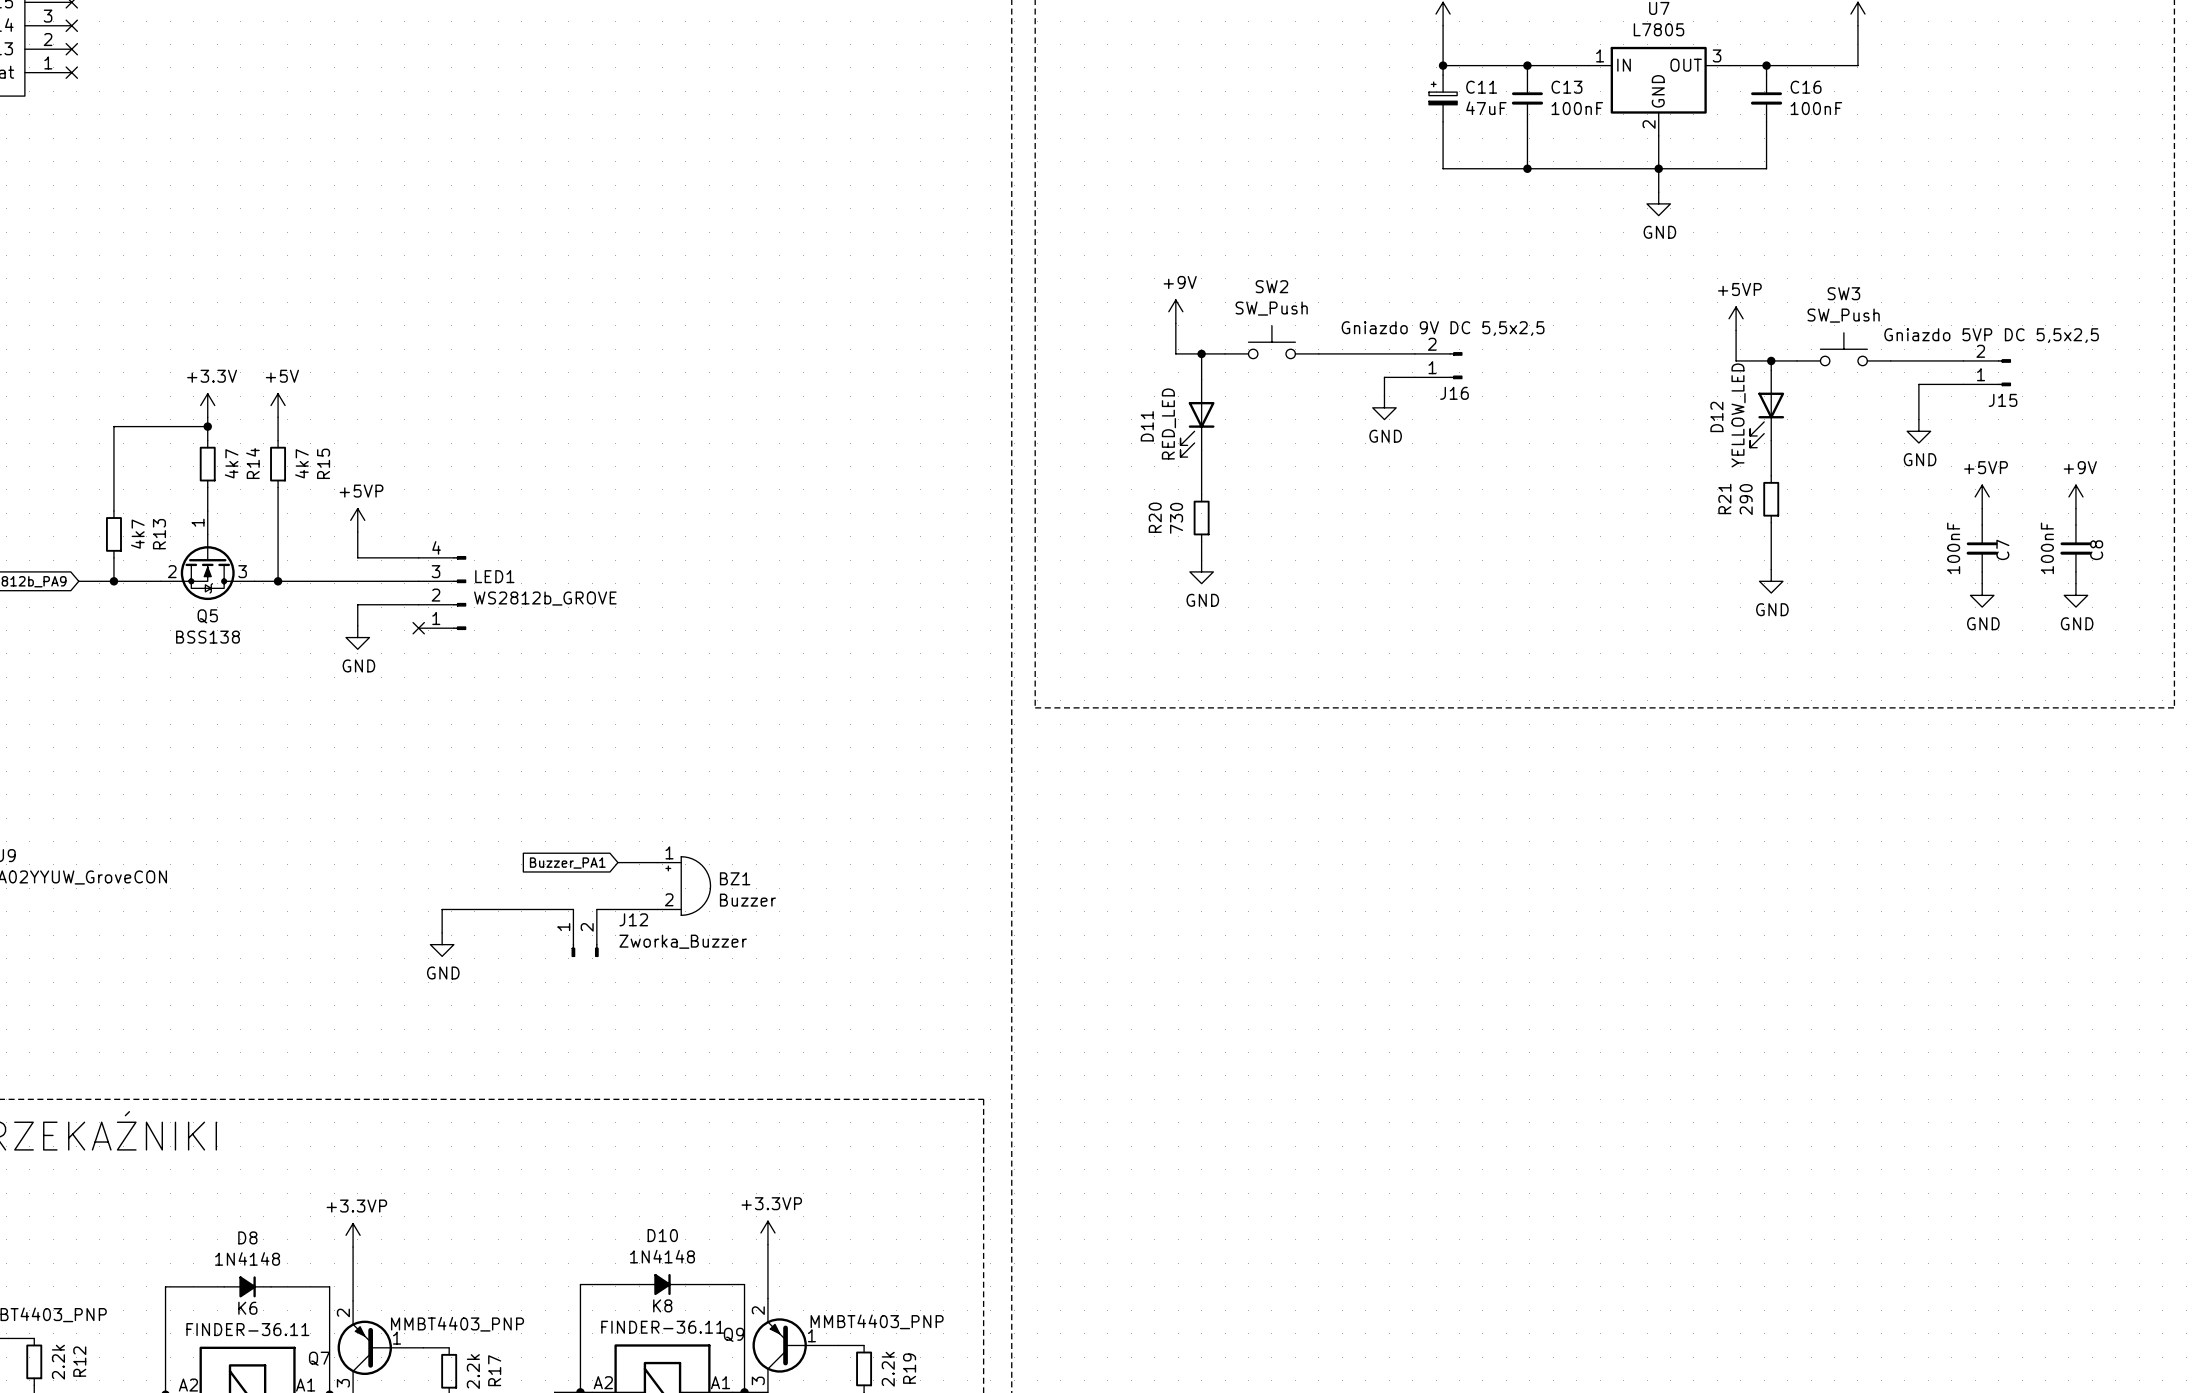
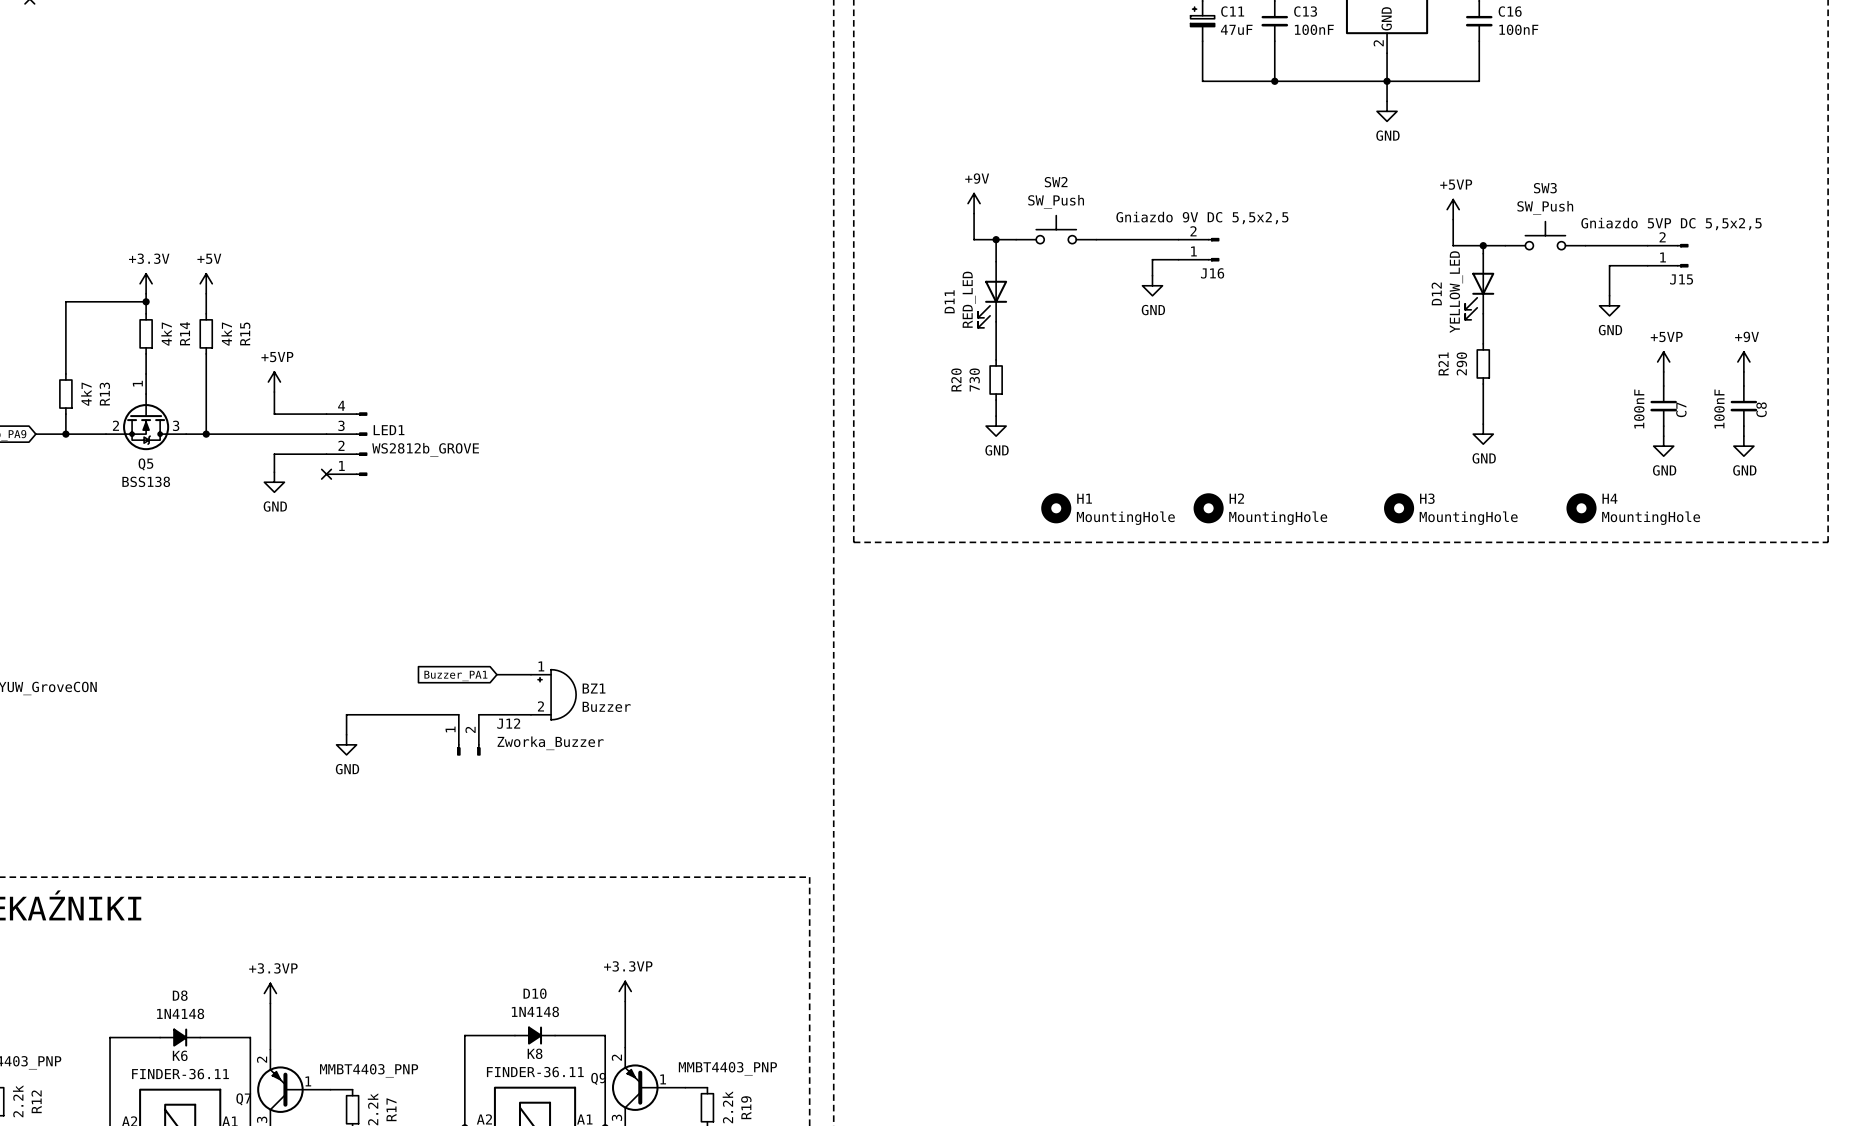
H1: none -> MountingHole (1056, 508)
H2: none -> MountingHole (1208, 508)
H3: none -> MountingHole (1399, 508)
H4: none -> MountingHole (1581, 508)

